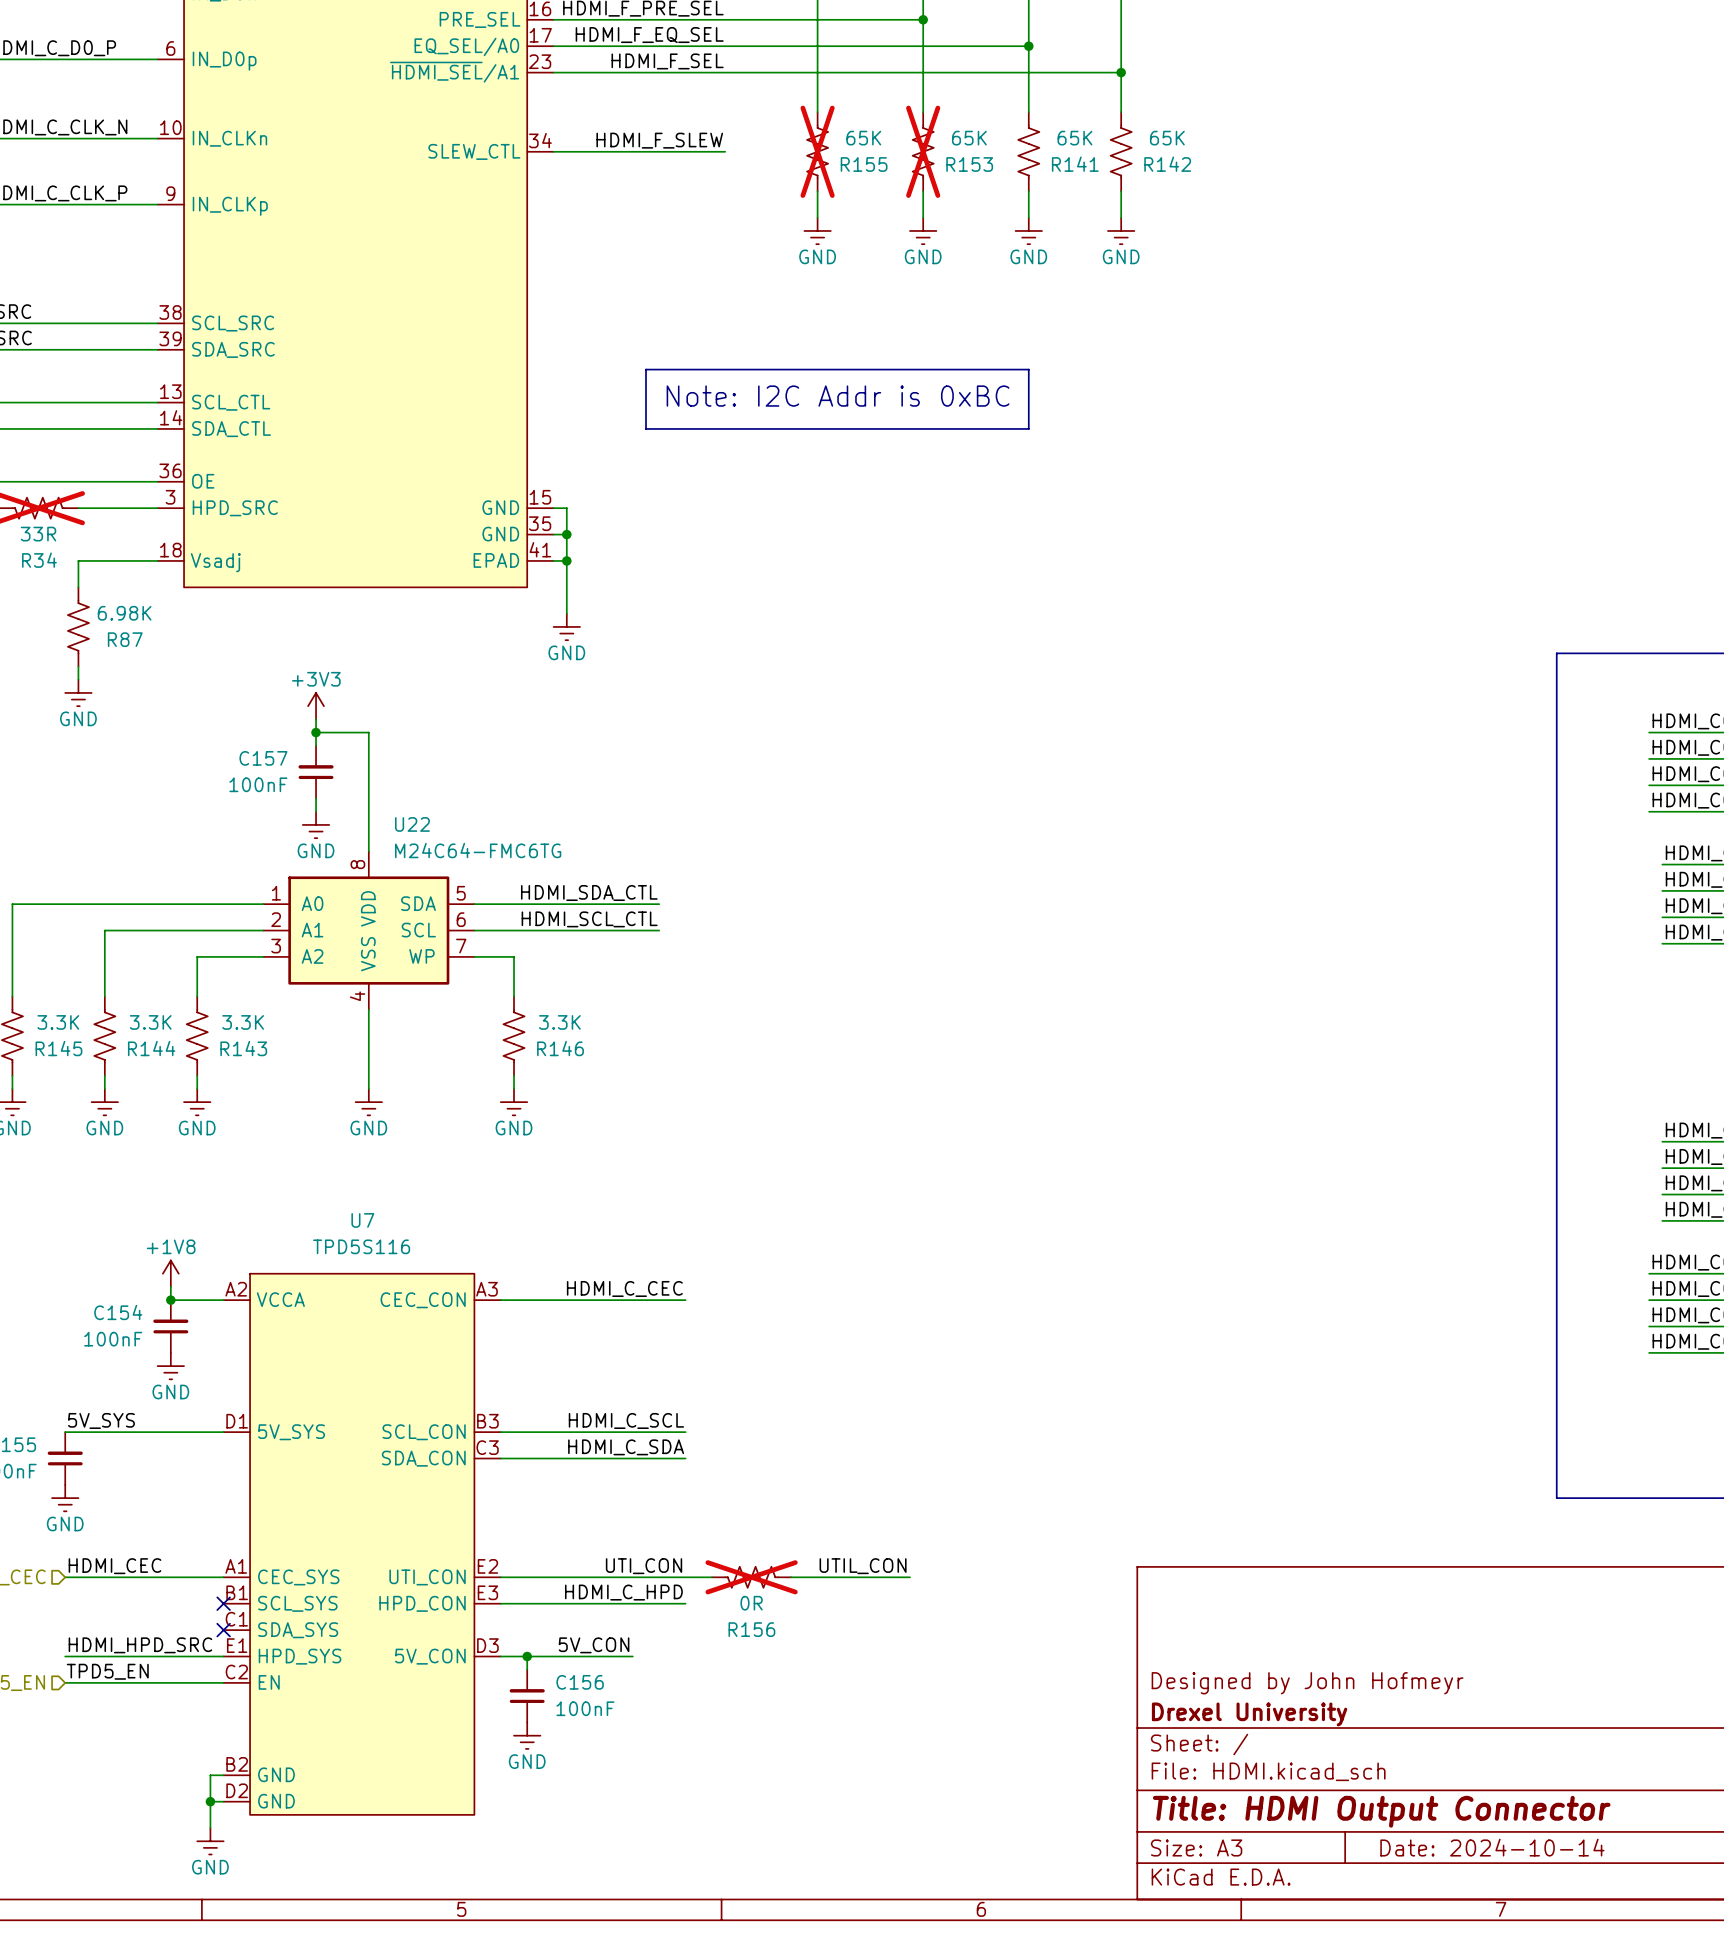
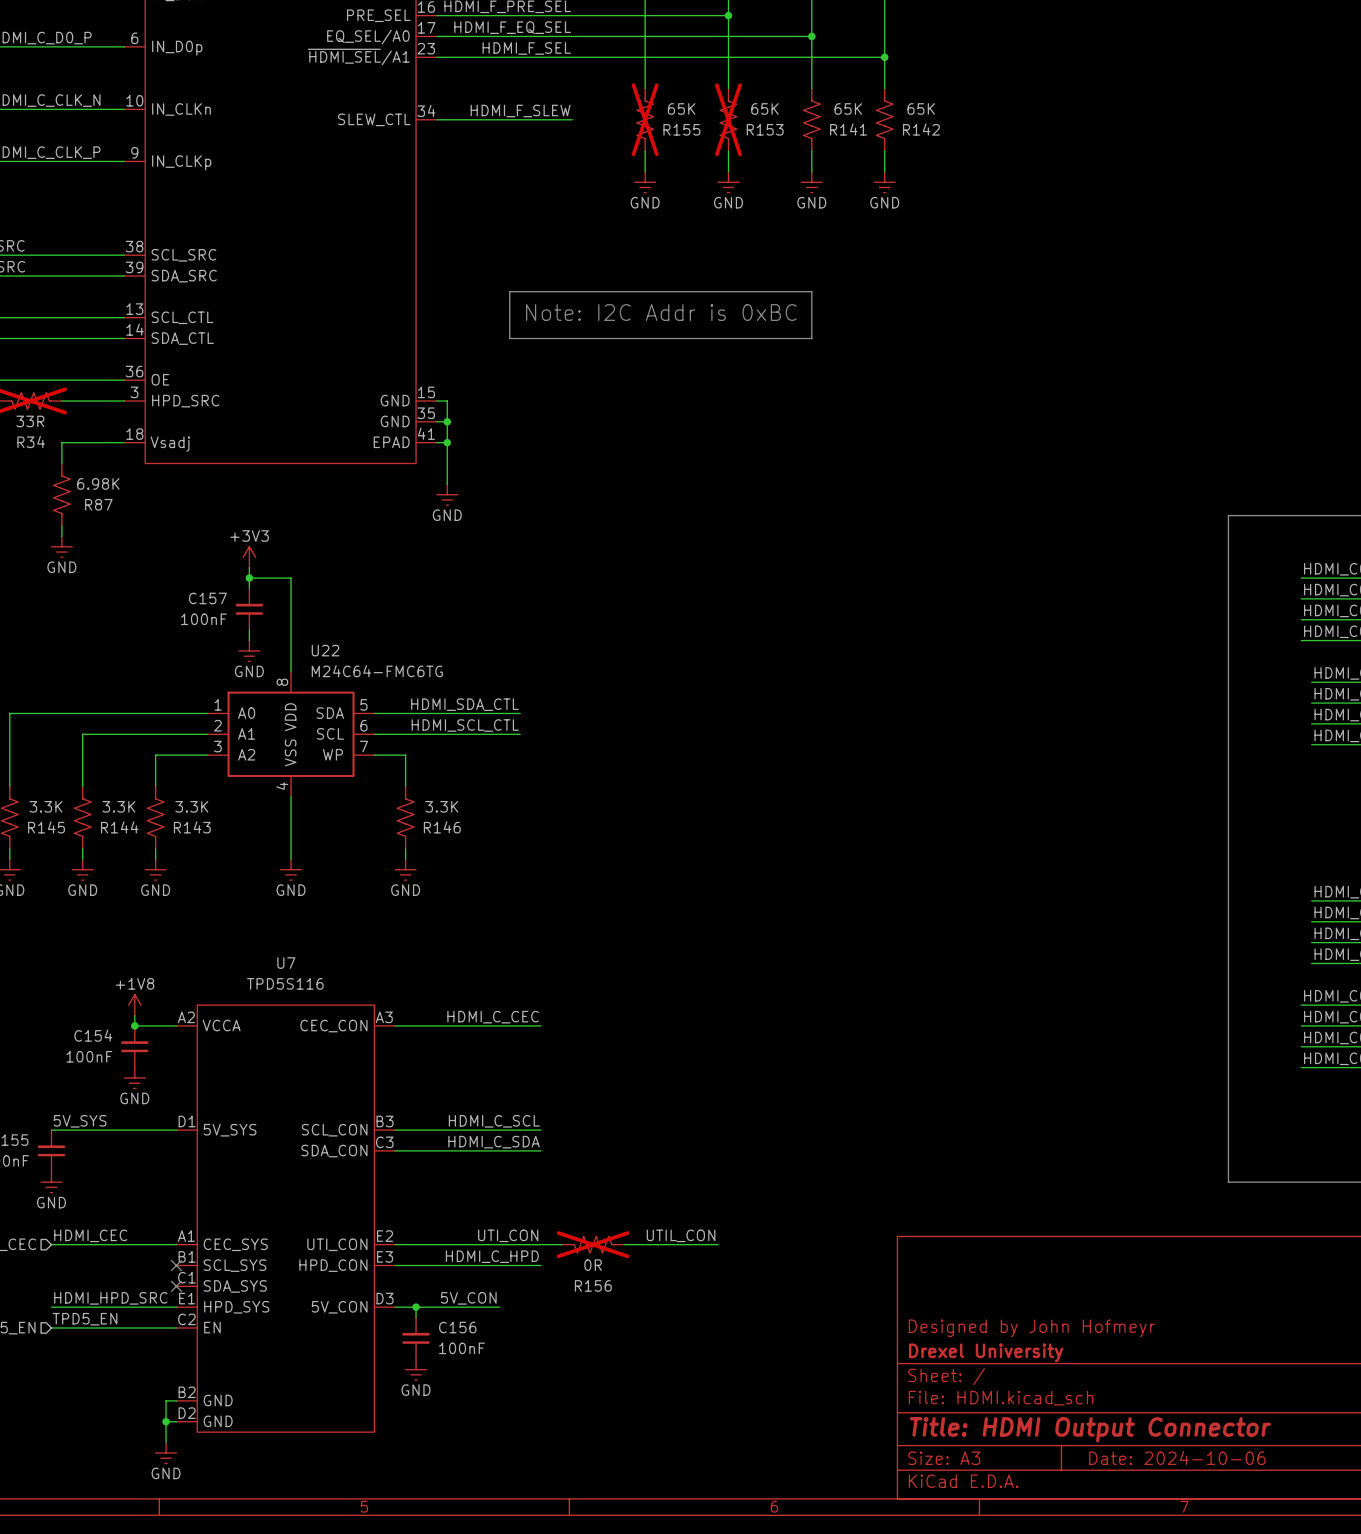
title block: Date: 2024-10-14 (1492, 1847) -> Date: 2024-10-06 (1177, 1457)

